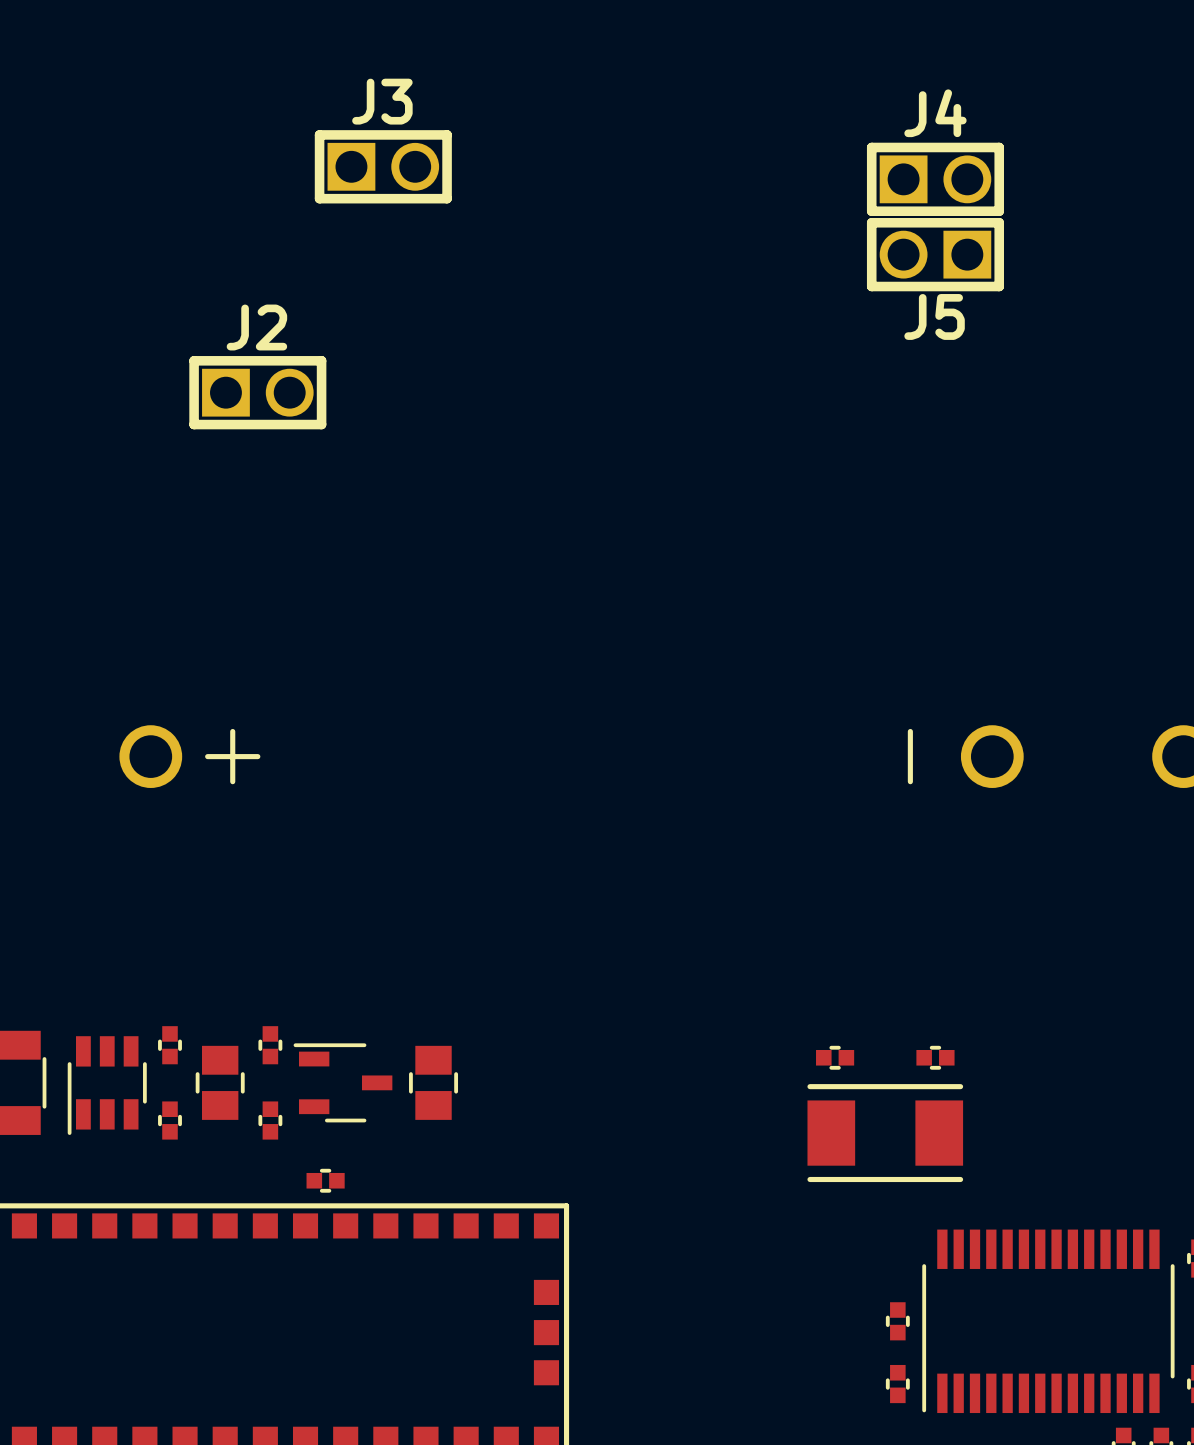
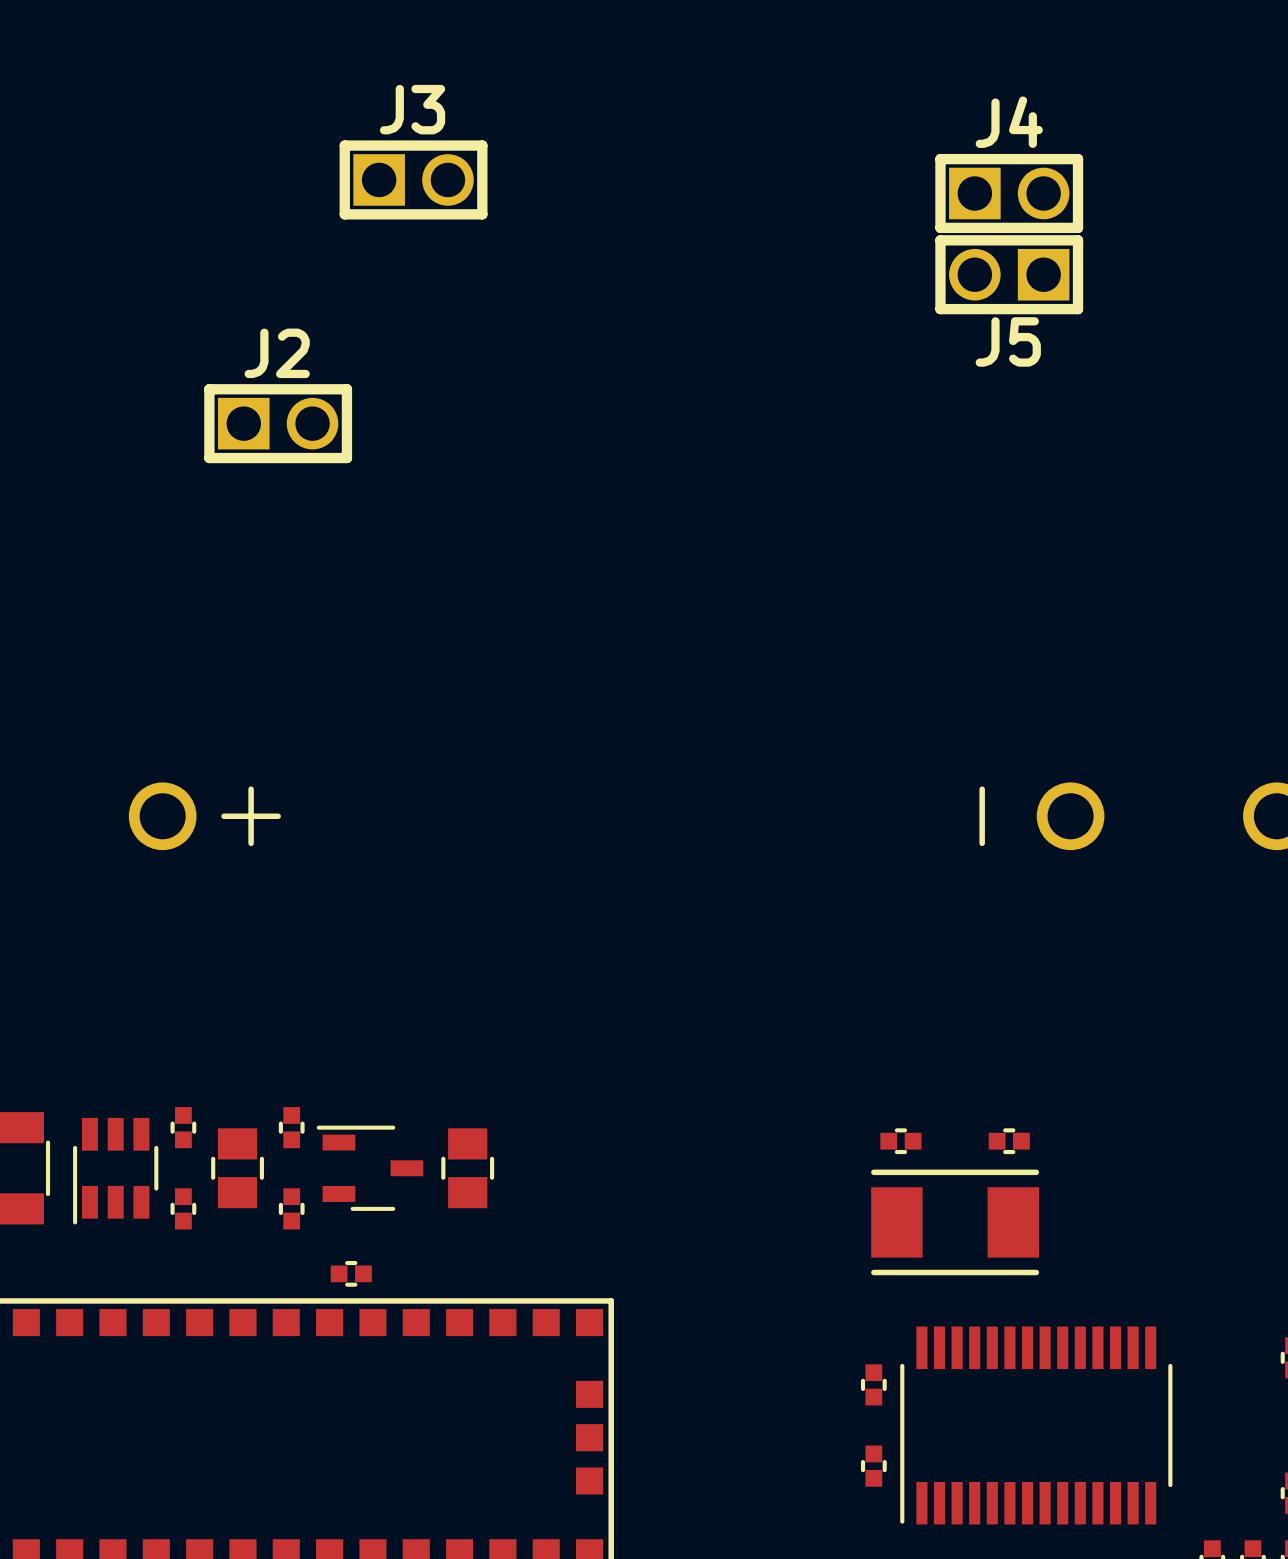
part: none -> (873, 1384)
part: (897, 1321) -> none
part position: (1048, 1321) -> (1036, 1425)
part: none -> (873, 1466)
part: (897, 1384) -> none

